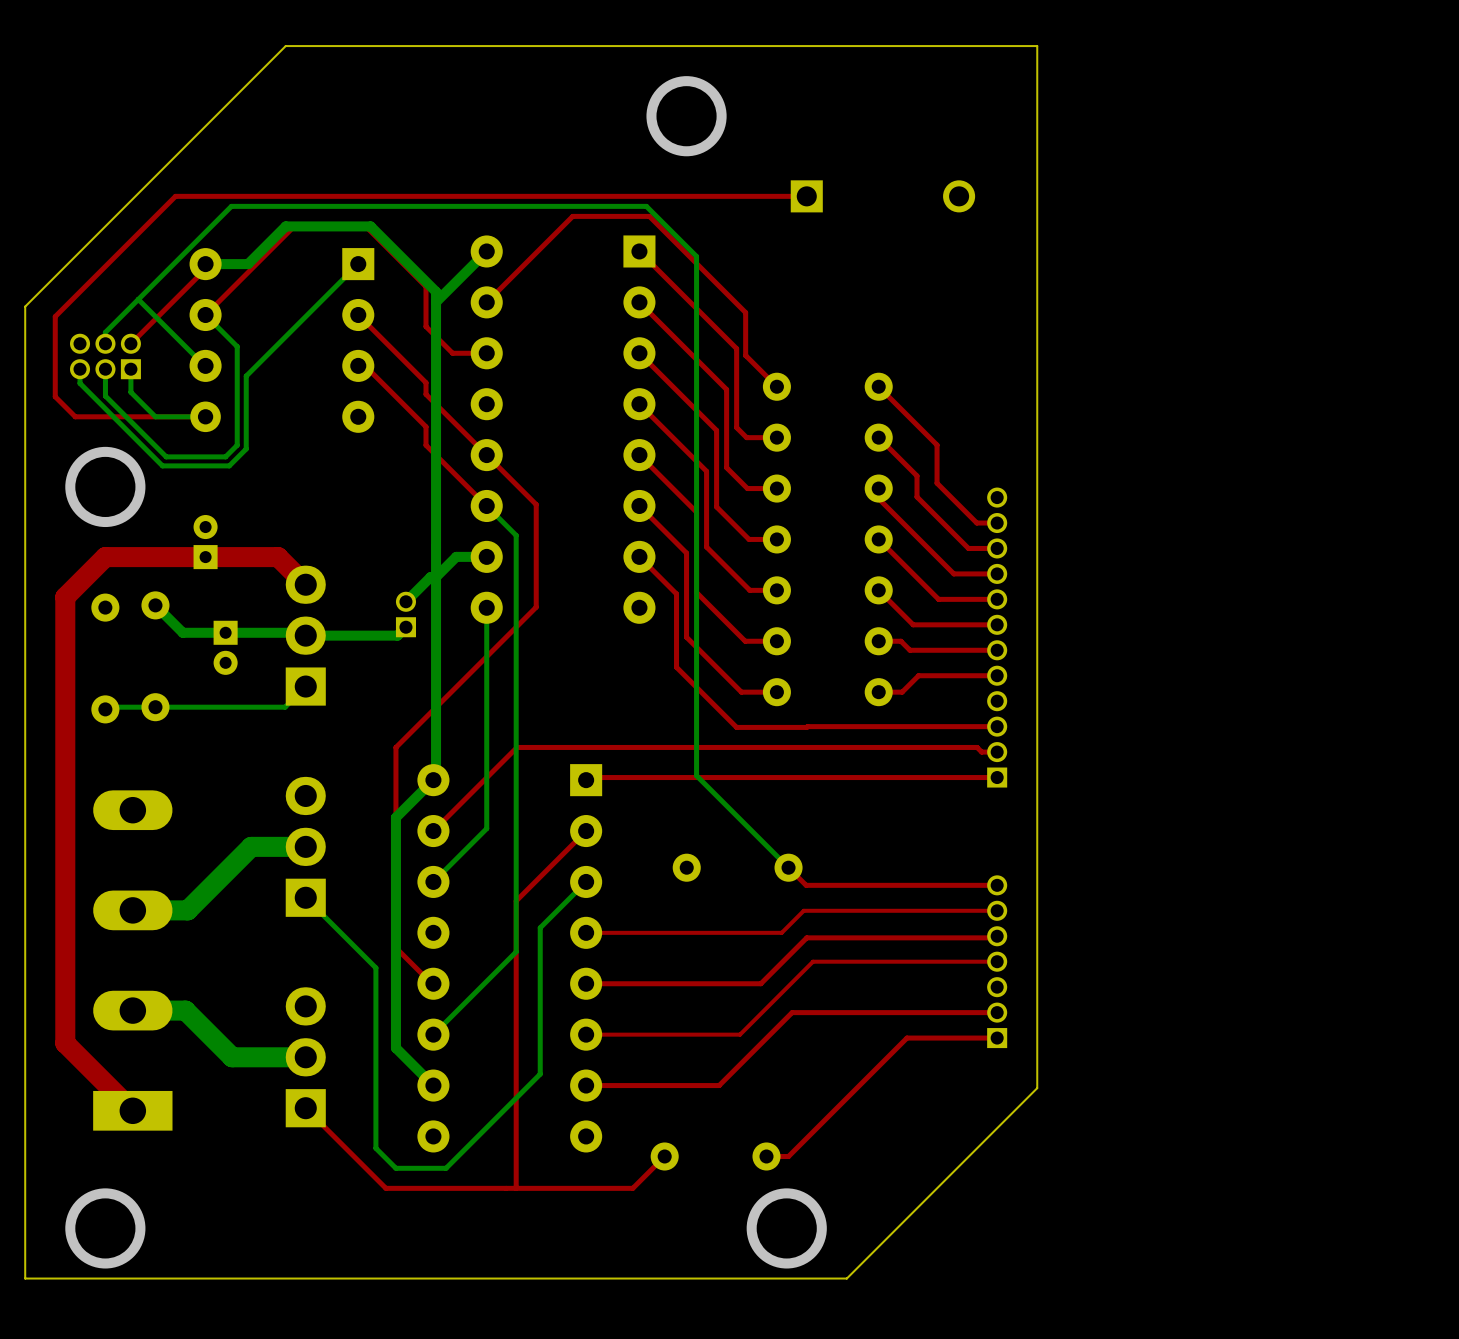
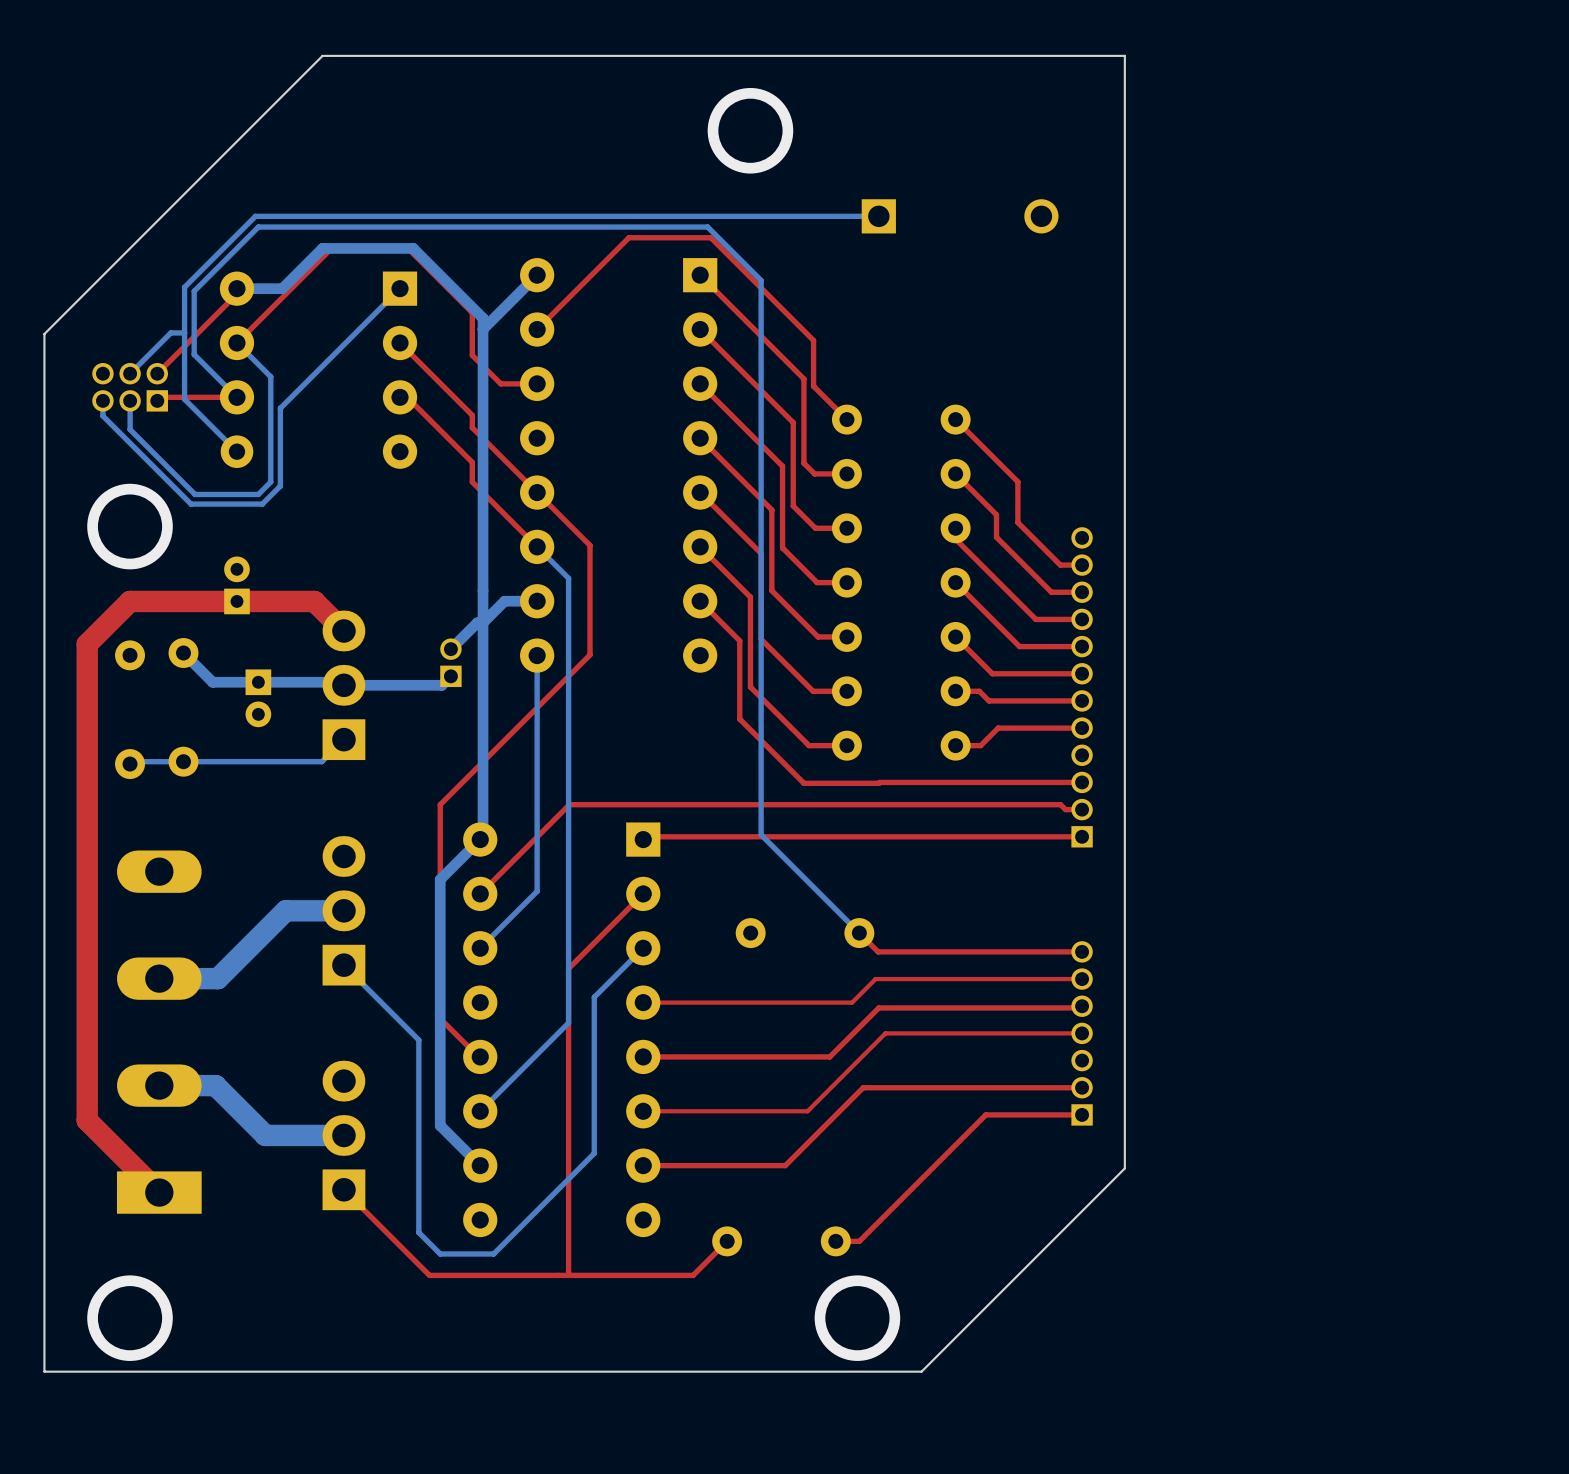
top track: (806, 196) (175, 196) (55, 316) (55, 396) (75, 416) (205, 416) -> none
bottom track: (231, 206) (105, 332) (105, 343) -> (264, 227) (258, 227) (194, 291) (194, 354) (236, 397)
bottom track: (138, 299) (205, 365) -> none
bottom track: none -> (184, 332) (170, 332) (130, 373)
top track: none -> (236, 397) (160, 397) (157, 400)
bottom track: (130, 369) (130, 392) (155, 416) (205, 416) -> (878, 216) (255, 216) (184, 287) (184, 399) (236, 451)

